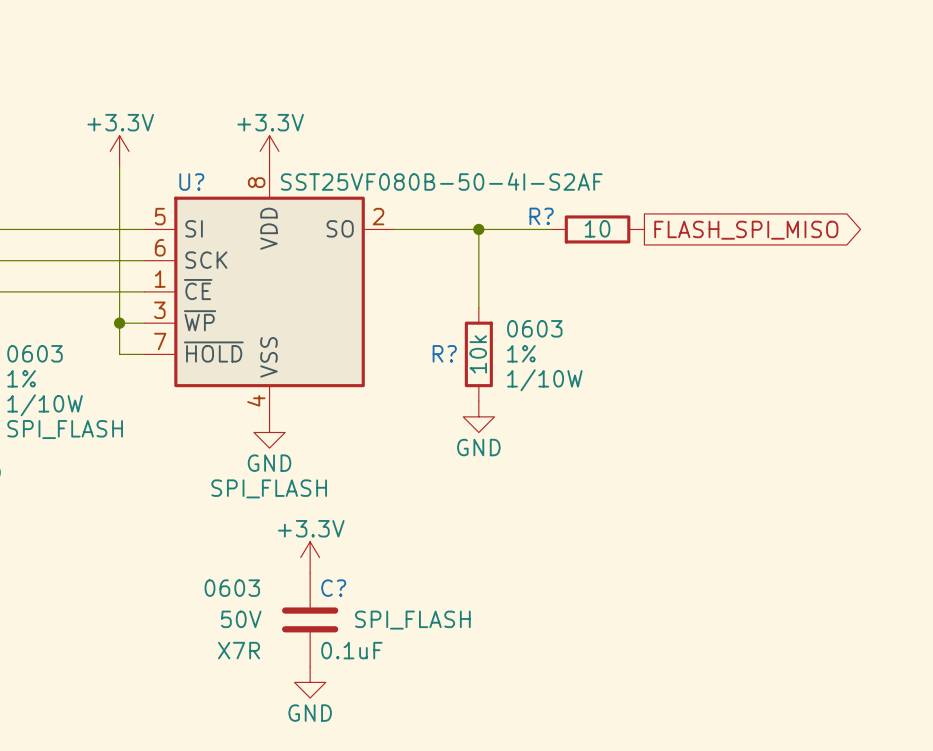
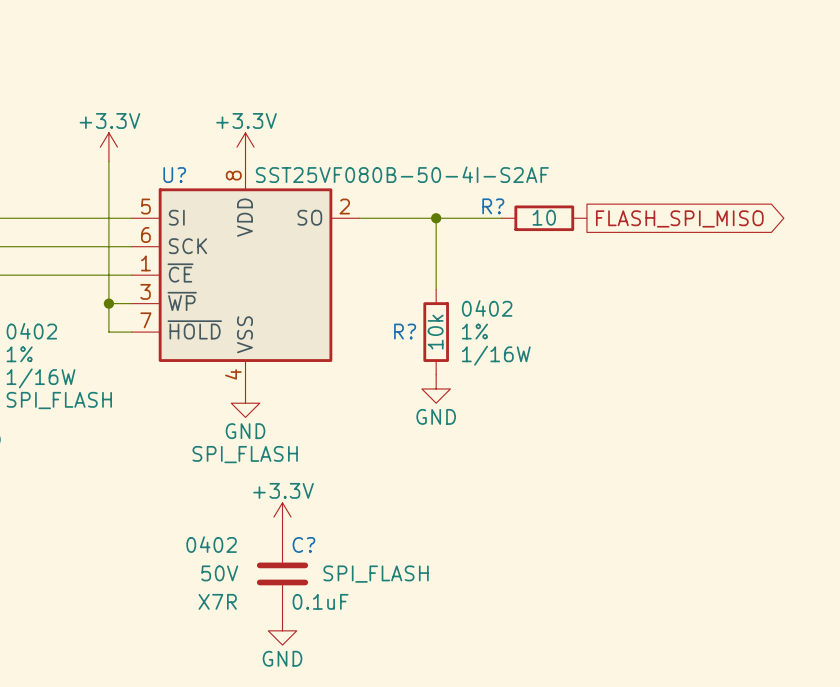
R? text: 0603 (534, 328) -> 0402 (487, 308)
part text: 0603 (35, 353) -> 0402 (31, 331)
R? text: 1/10W (544, 380) -> 1/16W (496, 355)
part text: 1/10W (45, 405) -> 1/16W (41, 378)
C? text: 0603 (232, 588) -> 0402 (211, 544)

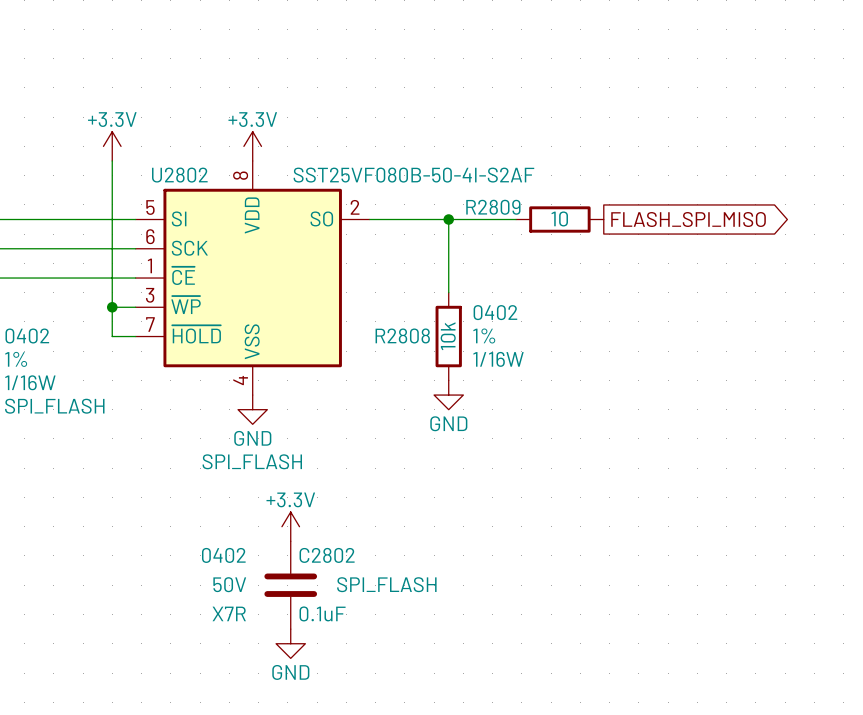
U? name: U? (174, 175) -> U2802 (179, 175)
R? name: R? (493, 206) -> R2809 (493, 207)
R? name: R? (405, 331) -> R2808 (402, 335)
C? name: C? (303, 544) -> C2802 (327, 555)

